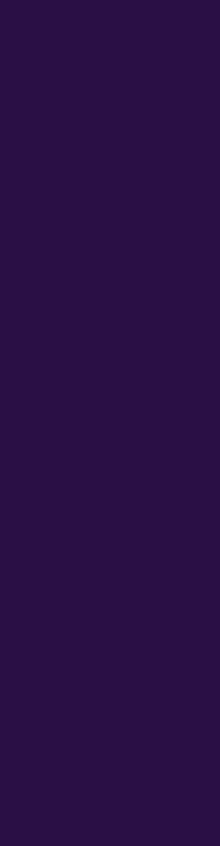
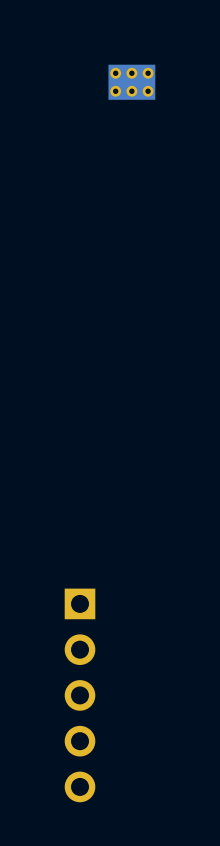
part: none -> (131, 82)
part: none -> (80, 695)

